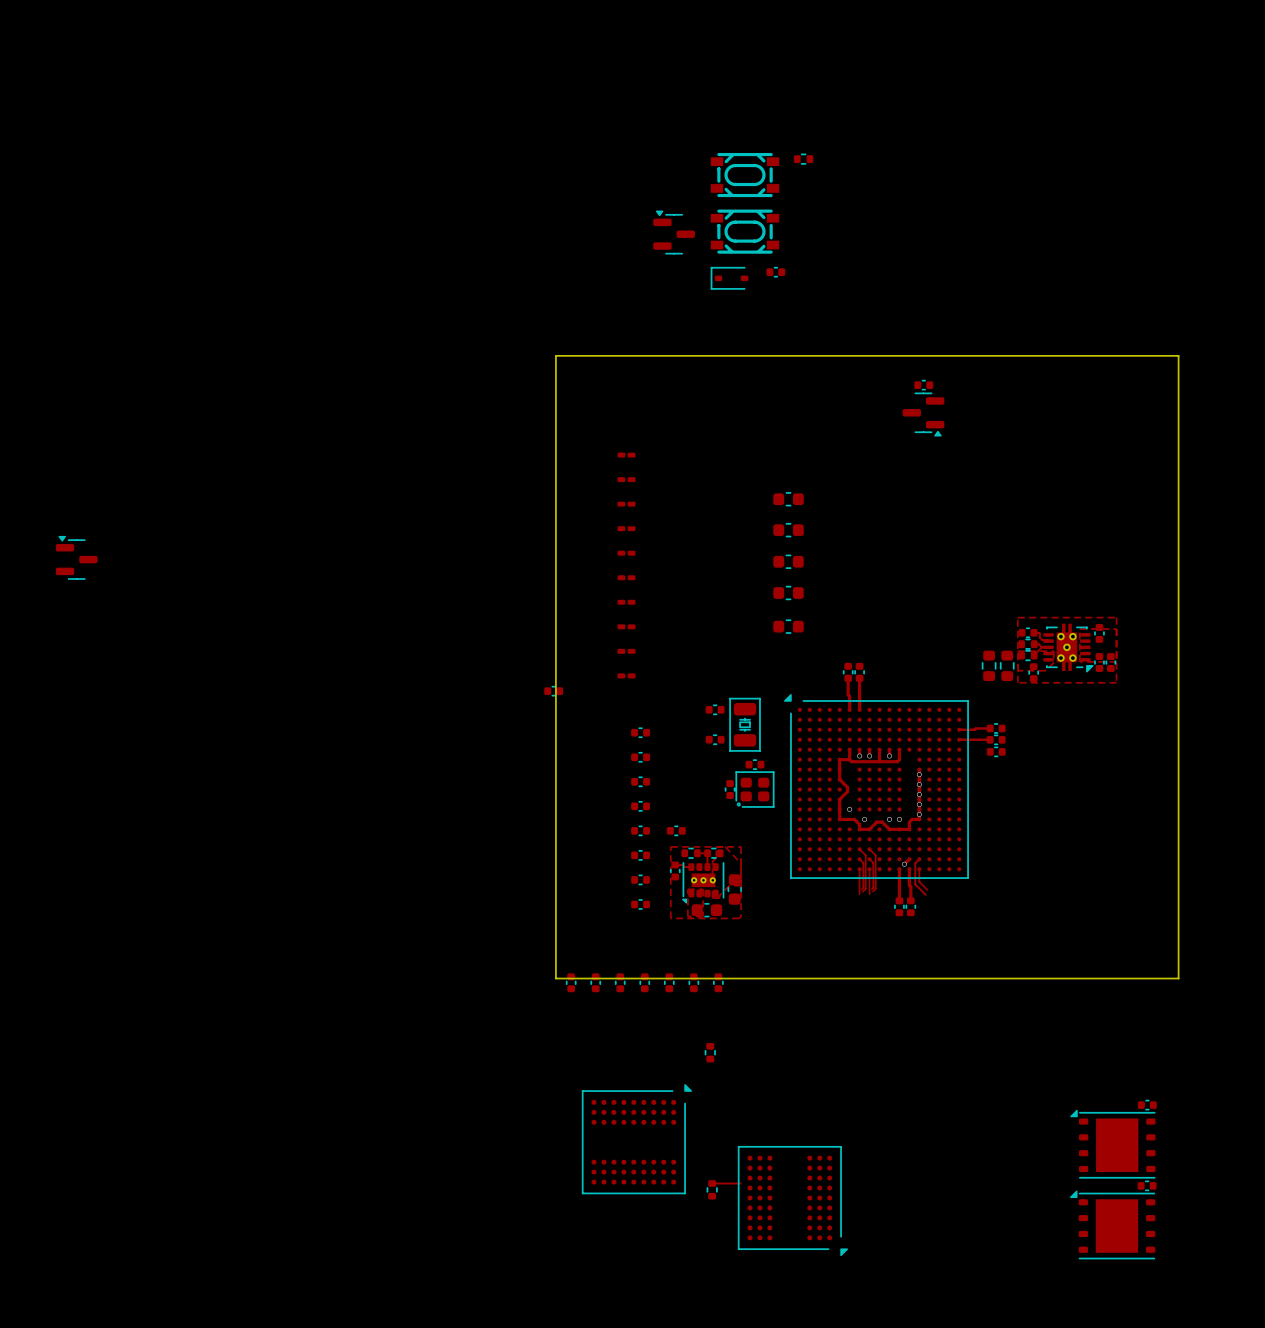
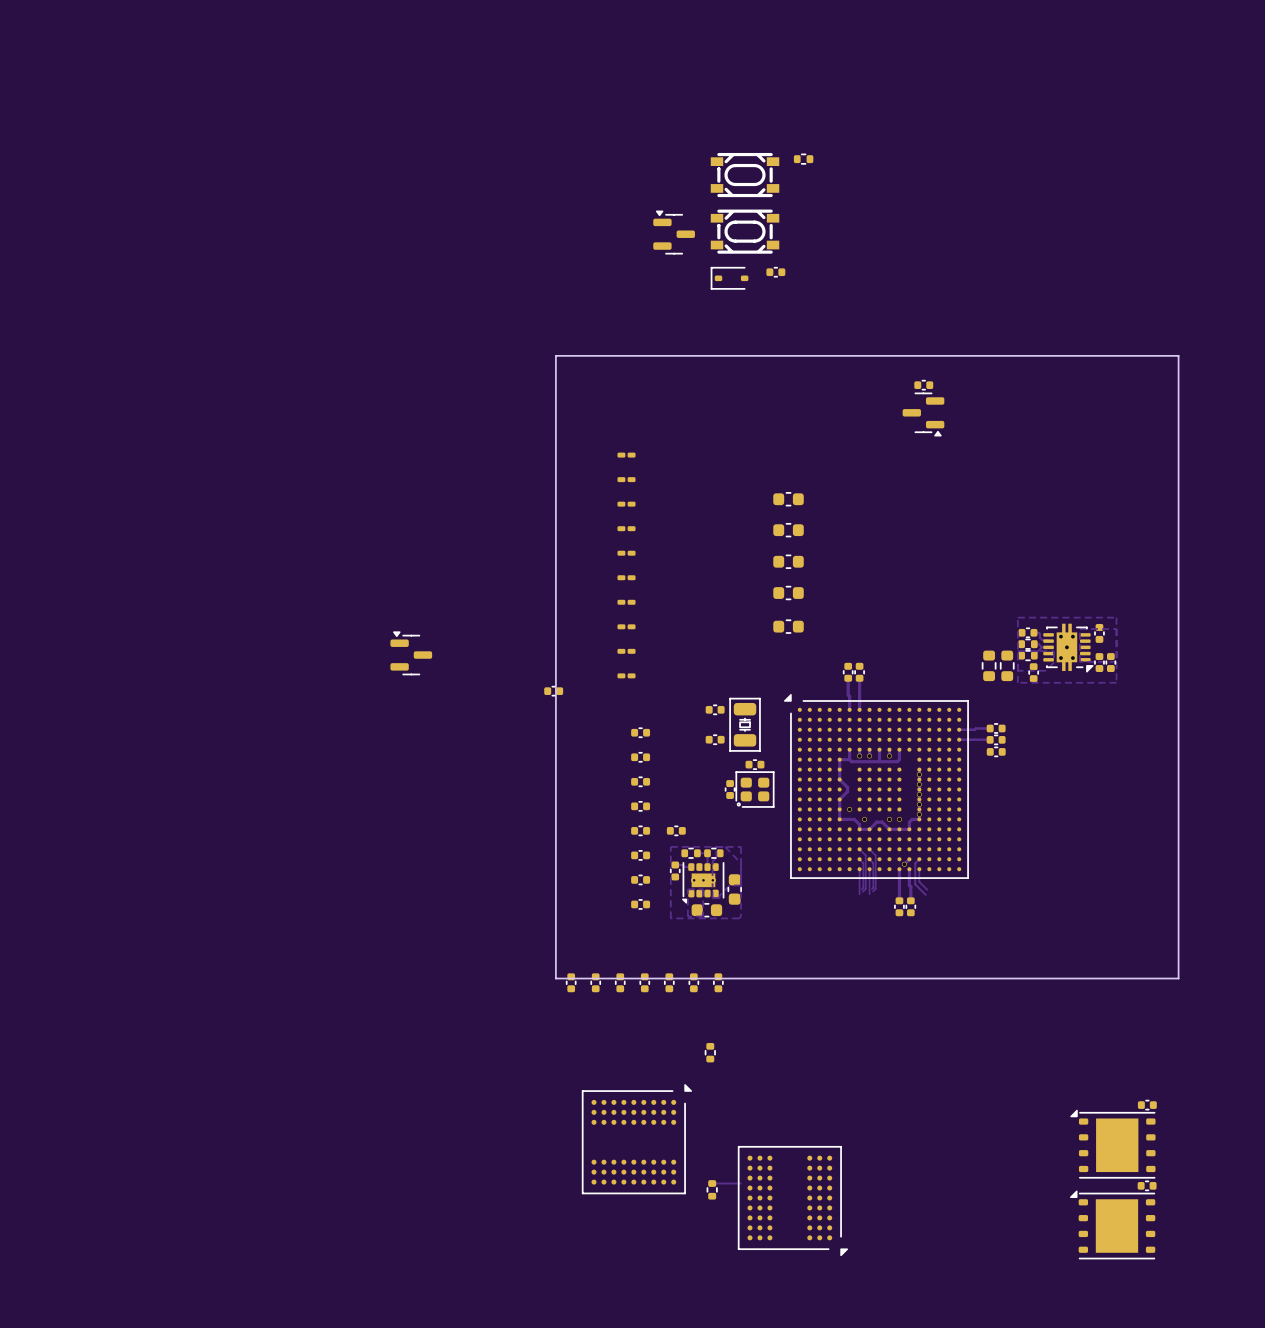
part: (76, 557) -> none
part: none -> (411, 653)

